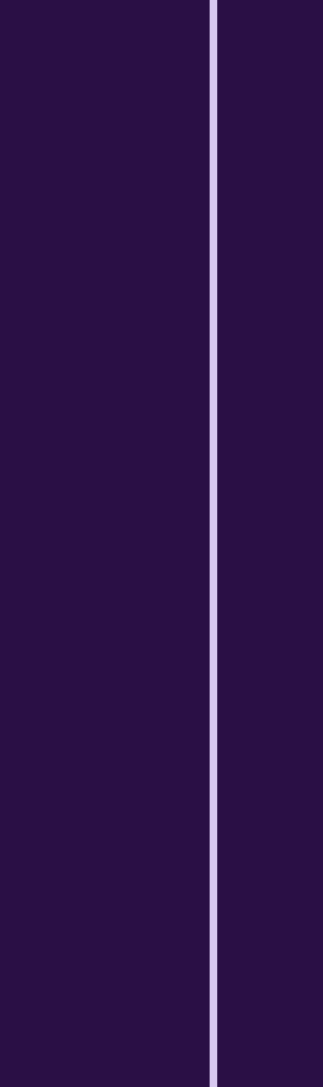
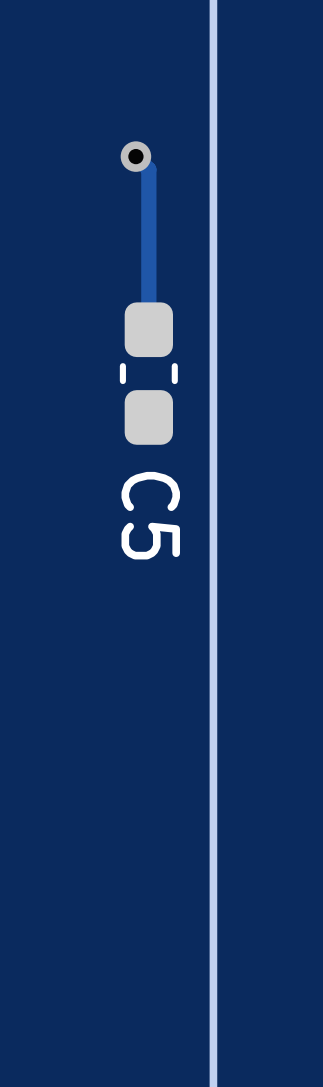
track: none -> (135, 156) (148, 169) (148, 329)
via: none -> (135, 156)
C5: none -> (148, 373)

